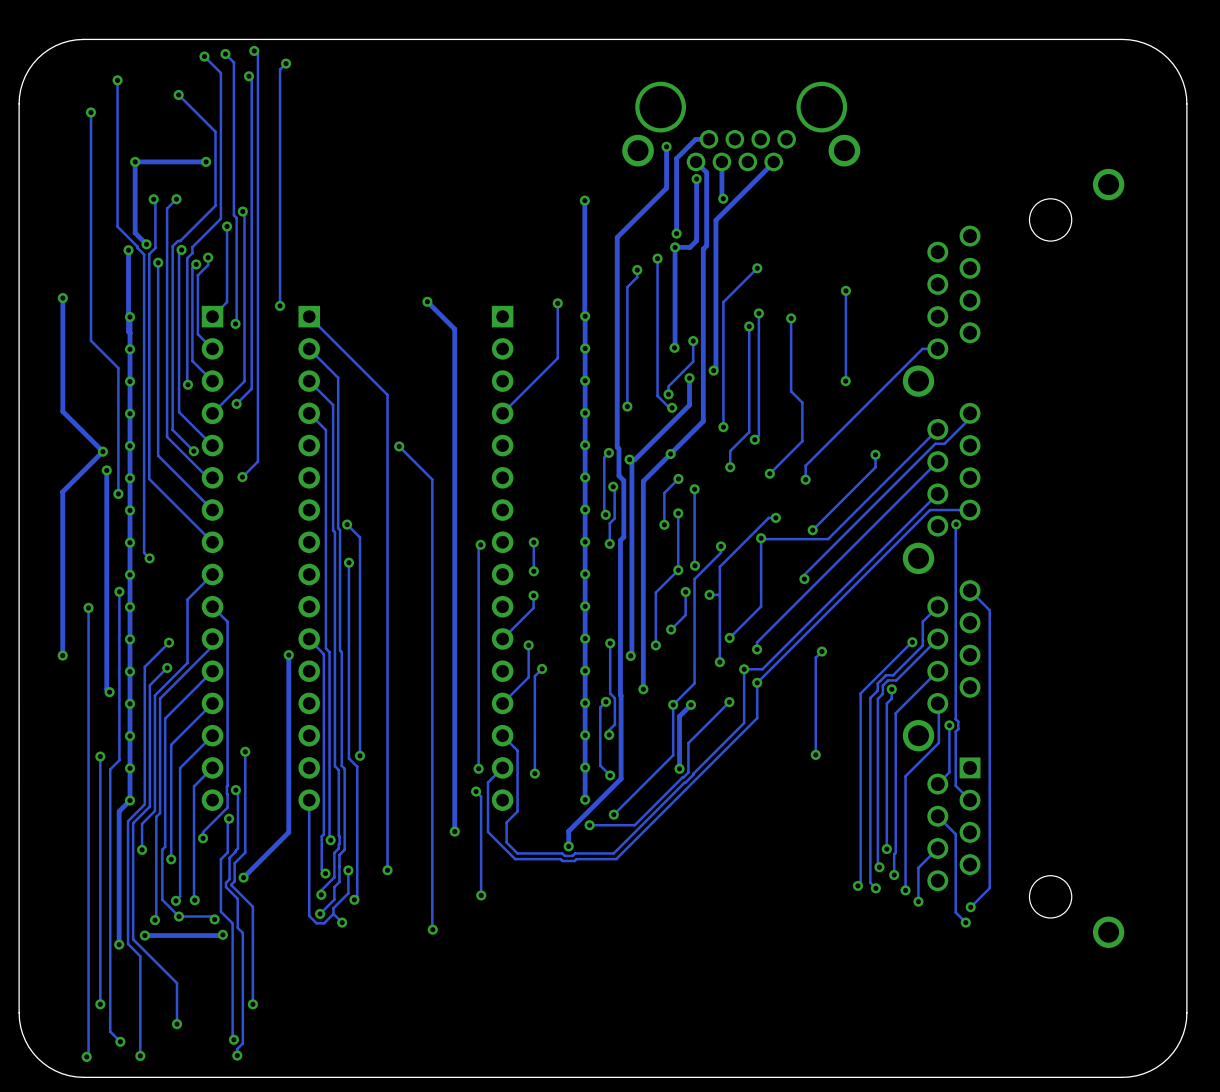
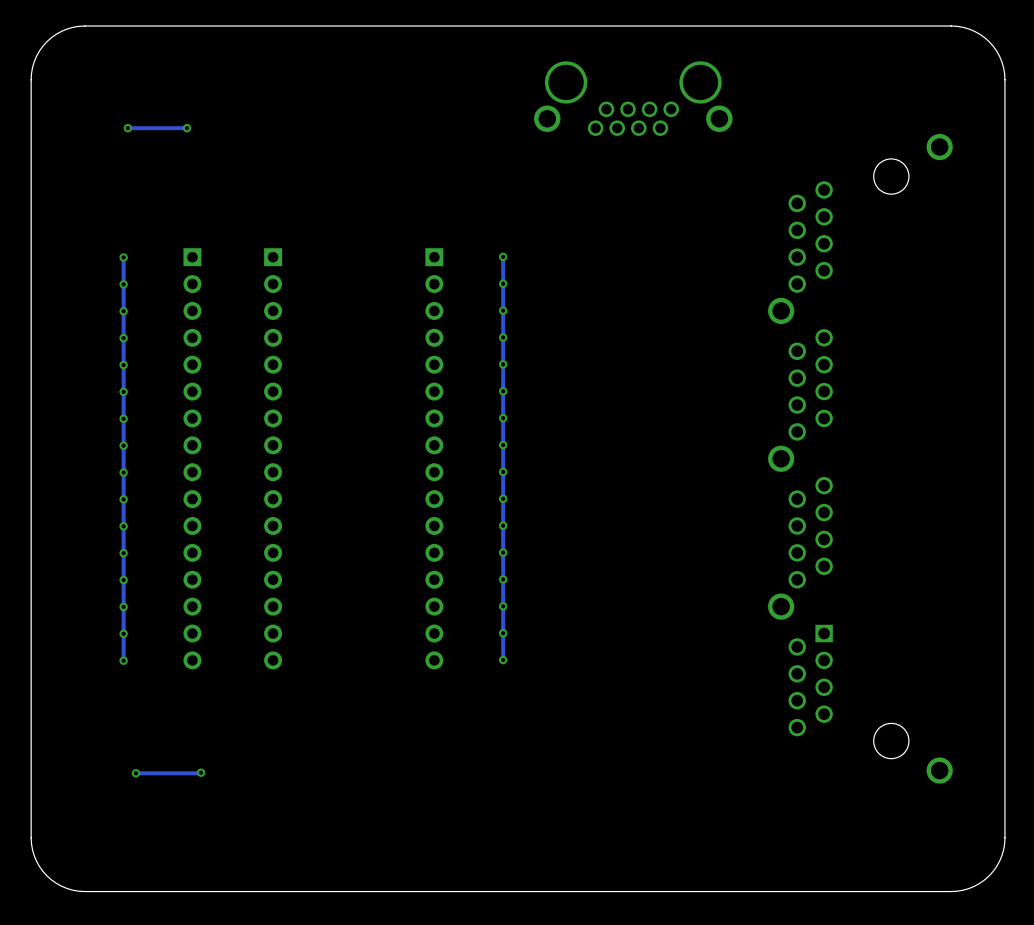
track: (254, 50) (257, 54) (257, 461) (242, 477) -> none
via: (254, 50) -> none
track: (225, 54) (233, 62) (233, 215) (236, 217) (235, 323) -> none
via: (225, 54) -> none
track: (204, 56) (220, 72) (220, 218) (192, 247) (192, 253) (187, 258) (187, 384) -> none
via: (204, 56) -> none
track: (286, 63) (280, 69) (280, 305) -> none
via: (286, 63) -> none
track: (248, 76) (251, 79) (251, 388) (236, 403) -> none
via: (248, 76) -> none
track: (117, 80) (117, 226) (144, 254) (144, 552) (149, 558) -> none
via: (117, 80) -> none
track: (178, 94) (215, 131) (215, 205) (172, 246) (172, 429) (193, 451) -> none
via: (178, 94) -> none
track: (90, 112) (90, 340) (118, 368) (118, 493) -> none
via: (90, 112) -> none
track: (708, 139) (695, 139) (676, 158) (676, 233) -> none
track: (666, 146) (666, 188) (617, 237) (617, 447) (618, 448) (618, 475) (623, 480) (623, 537) (620, 540) (621, 778) (568, 831) (568, 846) -> none
via: (666, 146) -> none
track: (135, 161) (135, 232) (146, 244) -> none
track: (696, 161) (706, 172) (706, 245) (703, 249) (703, 421) (643, 481) (643, 689) -> none
track: (721, 161) (723, 198) -> none
track: (773, 162) (715, 220) (715, 368) (713, 370) -> none
track: (696, 179) (696, 240) (690, 247) (675, 247) (674, 347) -> none
via: (696, 179) -> none
via: (723, 198) -> none
track: (153, 199) (155, 200) (155, 248) (149, 254) (149, 479) (212, 542) -> none
via: (153, 199) -> none
track: (176, 199) (167, 208) (167, 436) (207, 477) -> none
via: (176, 199) -> none
track: (584, 200) (585, 316) -> none
via: (584, 200) -> none
track: (242, 211) (244, 213) (244, 381) (212, 413) -> none
via: (242, 211) -> none
track: (227, 226) (227, 302) (212, 316) -> none
via: (227, 226) -> none
via: (676, 233) -> none
via: (146, 244) -> none
via: (675, 247) -> none
track: (181, 249) (179, 252) (179, 412) (212, 445) -> none
via: (181, 249) -> none
track: (128, 250) (130, 333) -> none
via: (128, 250) -> none
track: (208, 257) (208, 265) (197, 275) (197, 334) (212, 348) -> none
via: (208, 257) -> none
track: (657, 258) (657, 395) (669, 407) (672, 407) -> none
via: (657, 258) -> none
track: (158, 262) (158, 455) (212, 510) -> none
via: (158, 262) -> none
track: (196, 264) (192, 268) (192, 361) (212, 381) -> none
via: (196, 264) -> none
track: (757, 268) (723, 302) (723, 427) -> none
via: (757, 268) -> none
track: (637, 270) (637, 277) (627, 287) (627, 406) -> none
via: (637, 270) -> none
track: (845, 290) (845, 381) -> none
via: (845, 290) -> none
track: (62, 298) (62, 411) (102, 451) (62, 491) (62, 655) -> none
via: (62, 298) -> none
track: (427, 301) (454, 329) (454, 831) -> none
via: (427, 301) -> none
track: (557, 303) (557, 358) (502, 413) -> none
via: (557, 303) -> none
via: (280, 305) -> none
track: (758, 313) (758, 435) (754, 439) -> none
via: (758, 313) -> none
track: (309, 316) (387, 394) (387, 870) -> none
track: (791, 318) (791, 391) (802, 402) (802, 441) (769, 473) -> none
via: (791, 318) -> none
via: (235, 323) -> none
track: (749, 326) (749, 432) (730, 451) (730, 467) -> none
via: (749, 326) -> none
track: (693, 341) (693, 361) (668, 386) (668, 394) -> none
via: (693, 341) -> none
via: (674, 347) -> none
track: (309, 348) (338, 377) (338, 528) (340, 530) (340, 650) (341, 652) (341, 765) (344, 768) (344, 849) (339, 854) (339, 882) (334, 887) (334, 899) (320, 913) -> none
track: (937, 348) (922, 348) (805, 465) (805, 479) -> none
via: (713, 370) -> none
track: (689, 378) (689, 405) (634, 459) (629, 459) -> none
via: (689, 378) -> none
track: (309, 381) (333, 404) (334, 766) (338, 770) (339, 843) (338, 848) (334, 852) (334, 877) (321, 890) (321, 894) -> none
via: (845, 381) -> none
via: (187, 384) -> none
via: (668, 394) -> none
via: (236, 403) -> none
via: (627, 406) -> none
via: (672, 407) -> none
track: (309, 413) (325, 430) (325, 648) (329, 652) (330, 840) -> none
track: (970, 418) (944, 443) (935, 443) (804, 574) (804, 579) -> none
via: (723, 427) -> none
track: (937, 429) (828, 539) (761, 539) -> none
via: (754, 439) -> none
track: (399, 446) (432, 479) (432, 929) -> none
via: (399, 446) -> none
via: (102, 451) -> none
via: (193, 451) -> none
track: (608, 452) (604, 457) (605, 514) -> none
via: (608, 452) -> none
via: (670, 453) -> none
track: (875, 454) (875, 467) (812, 530) -> none
via: (875, 454) -> none
via: (629, 459) -> none
track: (631, 459) (630, 655) -> none
track: (937, 461) (757, 642) (757, 649) -> none
via: (730, 467) -> none
track: (106, 470) (106, 689) (109, 692) -> none
via: (106, 470) -> none
via: (769, 473) -> none
via: (242, 477) -> none
track: (678, 478) (664, 493) (664, 524) -> none
via: (678, 478) -> none
via: (805, 479) -> none
track: (613, 486) (614, 518) (609, 523) (609, 543) -> none
via: (613, 486) -> none
track: (694, 489) (694, 565) -> none
via: (694, 489) -> none
via: (118, 493) -> none
track: (937, 493) (762, 669) (744, 669) (744, 723) (613, 853) (575, 853) (572, 855) (564, 855) (562, 853) (517, 853) (506, 842) (506, 822) (517, 811) (517, 750) (502, 735) -> none
track: (970, 510) (929, 510) (757, 682) (757, 718) (616, 859) (576, 859) (574, 861) (515, 859) (488, 831) (488, 782) (502, 767) -> none
track: (678, 513) (678, 570) (655, 592) (655, 645) -> none
via: (678, 513) -> none
via: (605, 514) -> none
track: (775, 517) (768, 517) (719, 566) (719, 662) -> none
via: (775, 517) -> none
track: (347, 524) (360, 537) (360, 755) -> none
via: (347, 524) -> none
via: (664, 524) -> none
track: (956, 524) (955, 719) (958, 721) (958, 729) (955, 731) (955, 785) (970, 800) -> none
via: (956, 524) -> none
via: (812, 530) -> none
track: (761, 538) (761, 606) (729, 637) -> none
via: (761, 538) -> none
track: (533, 542) (533, 571) -> none
via: (533, 542) -> none
via: (609, 543) -> none
track: (480, 544) (478, 546) (478, 768) -> none
via: (480, 544) -> none
track: (720, 546) (720, 552) (694, 579) (694, 683) (673, 704) (673, 755) (613, 814) -> none
via: (720, 546) -> none
via: (149, 558) -> none
track: (348, 562) (348, 758) (357, 766) (357, 896) (354, 899) -> none
via: (348, 562) -> none
via: (694, 565) -> none
via: (678, 570) -> none
via: (533, 571) -> none
track: (212, 574) (187, 599) (187, 662) (154, 695) (154, 810) (142, 823) (142, 849) -> none
via: (804, 579) -> none
track: (970, 590) (989, 610) (989, 888) (970, 907) -> none
track: (119, 591) (119, 760) (110, 769) (110, 1031) (120, 1041) -> none
via: (119, 591) -> none
track: (685, 591) (685, 615) (671, 629) -> none
via: (685, 591) -> none
via: (709, 594) -> none
track: (719, 594) (709, 594) -> none
track: (533, 595) (533, 608) (502, 638) -> none
via: (533, 595) -> none
track: (212, 606) (227, 621) (227, 807) (203, 832) (203, 838) -> none
track: (937, 606) (922, 621) (922, 645) (893, 675) (885, 675) (877, 683) (877, 690) (870, 698) (870, 882) (875, 888) -> none
track: (88, 607) (88, 1055) (86, 1056) -> none
via: (88, 607) -> none
via: (671, 629) -> none
via: (729, 637) -> none
track: (937, 638) (896, 680) (888, 680) (882, 685) (882, 693) (877, 698) (877, 865) (879, 867) -> none
track: (309, 639) (323, 654) (323, 834) (321, 836) (321, 869) (325, 873) -> none
track: (169, 642) (144, 666) (144, 804) (128, 821) (128, 943) (140, 956) (140, 1055) -> none
via: (169, 642) -> none
track: (912, 642) (860, 693) (860, 885) (857, 885) -> none
via: (912, 642) -> none
track: (610, 643) (610, 693) (614, 698) (614, 724) (609, 730) (609, 734) -> none
via: (610, 643) -> none
track: (528, 645) (528, 677) (502, 703) -> none
via: (528, 645) -> none
via: (655, 645) -> none
track: (212, 646) (160, 698) (160, 813) (156, 816) (154, 920) -> none
via: (757, 649) -> none
track: (821, 651) (815, 657) (815, 754) -> none
via: (821, 651) -> none
via: (62, 655) -> none
track: (288, 655) (288, 832) (243, 877) -> none
via: (288, 655) -> none
via: (630, 655) -> none
via: (719, 662) -> none
track: (167, 667) (149, 685) (149, 806) (133, 823) (133, 939) (177, 983) (177, 1024) -> none
via: (167, 667) -> none
track: (542, 668) (534, 676) (534, 773) -> none
via: (542, 668) -> none
via: (744, 669) -> none
track: (212, 671) (165, 718) (165, 846) (162, 849) (162, 899) (179, 916) (211, 916) (214, 919) -> none
track: (937, 671) (895, 713) (894, 875) -> none
via: (757, 682) -> none
via: (643, 689) -> none
track: (891, 689) (891, 698) (886, 703) (886, 849) -> none
via: (891, 689) -> none
via: (109, 692) -> none
track: (605, 701) (600, 707) (600, 765) (610, 775) -> none
via: (605, 701) -> none
track: (729, 702) (688, 743) (688, 772) (634, 825) (589, 825) -> none
via: (729, 702) -> none
track: (212, 703) (171, 744) (171, 859) -> none
via: (673, 704) -> none
track: (691, 704) (679, 716) (679, 768) -> none
via: (691, 704) -> none
track: (938, 704) (938, 743) (905, 776) (905, 890) -> none
track: (949, 725) (949, 772) (937, 784) -> none
via: (949, 725) -> none
via: (609, 734) -> none
track: (212, 735) (180, 768) (180, 896) (175, 900) -> none
track: (245, 751) (245, 852) (234, 863) (234, 881) (231, 885) (252, 906) (252, 1004) -> none
via: (245, 751) -> none
via: (815, 754) -> none
via: (360, 755) -> none
track: (100, 756) (100, 1004) -> none
via: (100, 756) -> none
track: (212, 767) (194, 786) (194, 900) -> none
via: (478, 768) -> none
via: (679, 768) -> none
via: (534, 773) -> none
via: (610, 775) -> none
track: (235, 790) (237, 792) (237, 848) (229, 857) (229, 879) (225, 882) (225, 887) (237, 898) (237, 927) (242, 933) (242, 1043) (237, 1049) (237, 1055) -> none
via: (235, 790) -> none
track: (476, 791) (481, 796) (481, 895) -> none
via: (476, 791) -> none
track: (130, 800) (119, 811) (119, 944) -> none
track: (309, 800) (309, 915) (316, 923) (324, 923) (333, 913) -> none
via: (613, 814) -> none
track: (937, 816) (955, 834) (955, 912) (965, 922) -> none
track: (229, 818) (227, 852) (220, 859) (220, 911) (232, 923) (233, 1039) -> none
via: (229, 818) -> none
via: (589, 825) -> none
via: (454, 831) -> none
via: (203, 838) -> none
via: (330, 840) -> none
via: (568, 846) -> none
track: (937, 848) (918, 867) (918, 901) -> none
via: (142, 849) -> none
via: (886, 849) -> none
via: (171, 859) -> none
via: (879, 867) -> none
track: (348, 870) (348, 893) (333, 908) (333, 913) -> none
via: (348, 870) -> none
via: (387, 870) -> none
via: (325, 873) -> none
via: (894, 875) -> none
via: (243, 877) -> none
via: (857, 885) -> none
via: (875, 888) -> none
via: (905, 890) -> none
via: (321, 894) -> none
via: (481, 895) -> none
via: (354, 899) -> none
via: (175, 900) -> none
via: (194, 900) -> none
via: (918, 901) -> none
via: (970, 907) -> none
via: (320, 913) -> none
track: (333, 913) (342, 922) -> none
via: (179, 916) -> none
via: (214, 919) -> none
via: (154, 920) -> none
via: (342, 922) -> none
via: (965, 922) -> none
via: (432, 929) -> none
via: (119, 944) -> none
via: (100, 1004) -> none
via: (252, 1004) -> none
via: (177, 1024) -> none
via: (233, 1039) -> none
via: (120, 1041) -> none
via: (140, 1055) -> none
via: (237, 1055) -> none
via: (86, 1056) -> none

